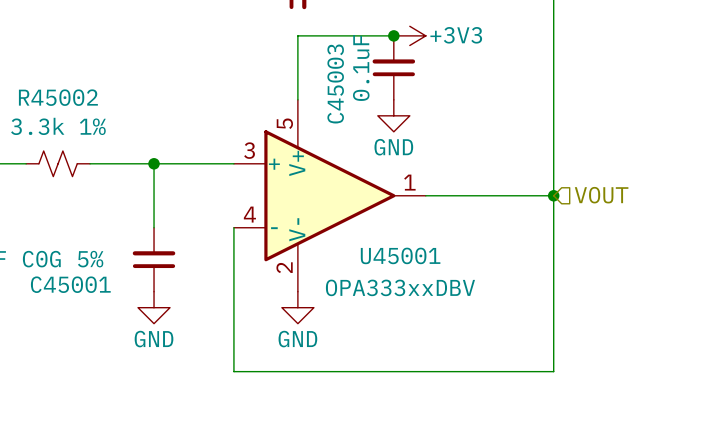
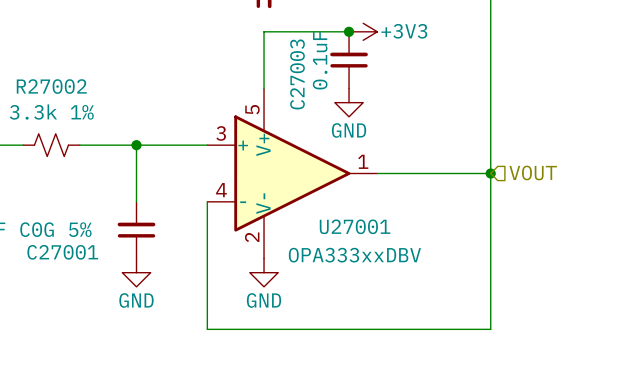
C45003 name: C45003 (335, 84) -> C27003 (297, 74)
R45002 name: R45002 (58, 97) -> R27002 (51, 86)
U45001 name: U45001 (400, 255) -> U27001 (355, 226)
C45001 name: C45001 (70, 284) -> C27001 (62, 252)

